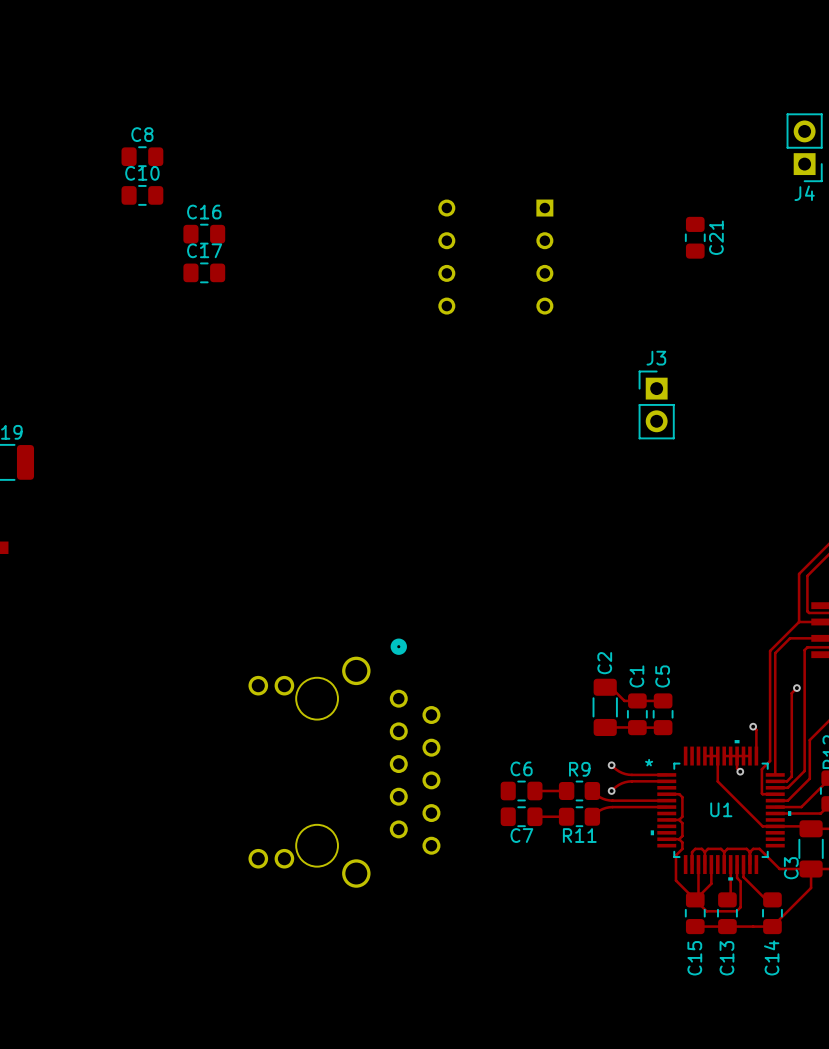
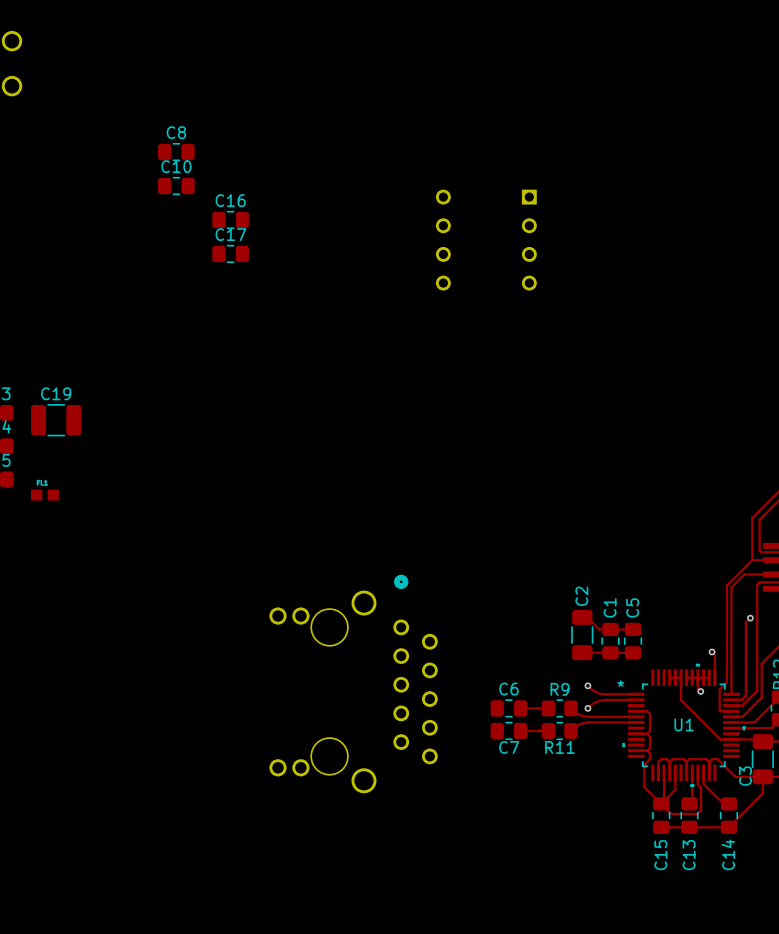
J4: (804, 147) -> none
C21: (695, 237) -> none
J3: (656, 404) -> none

